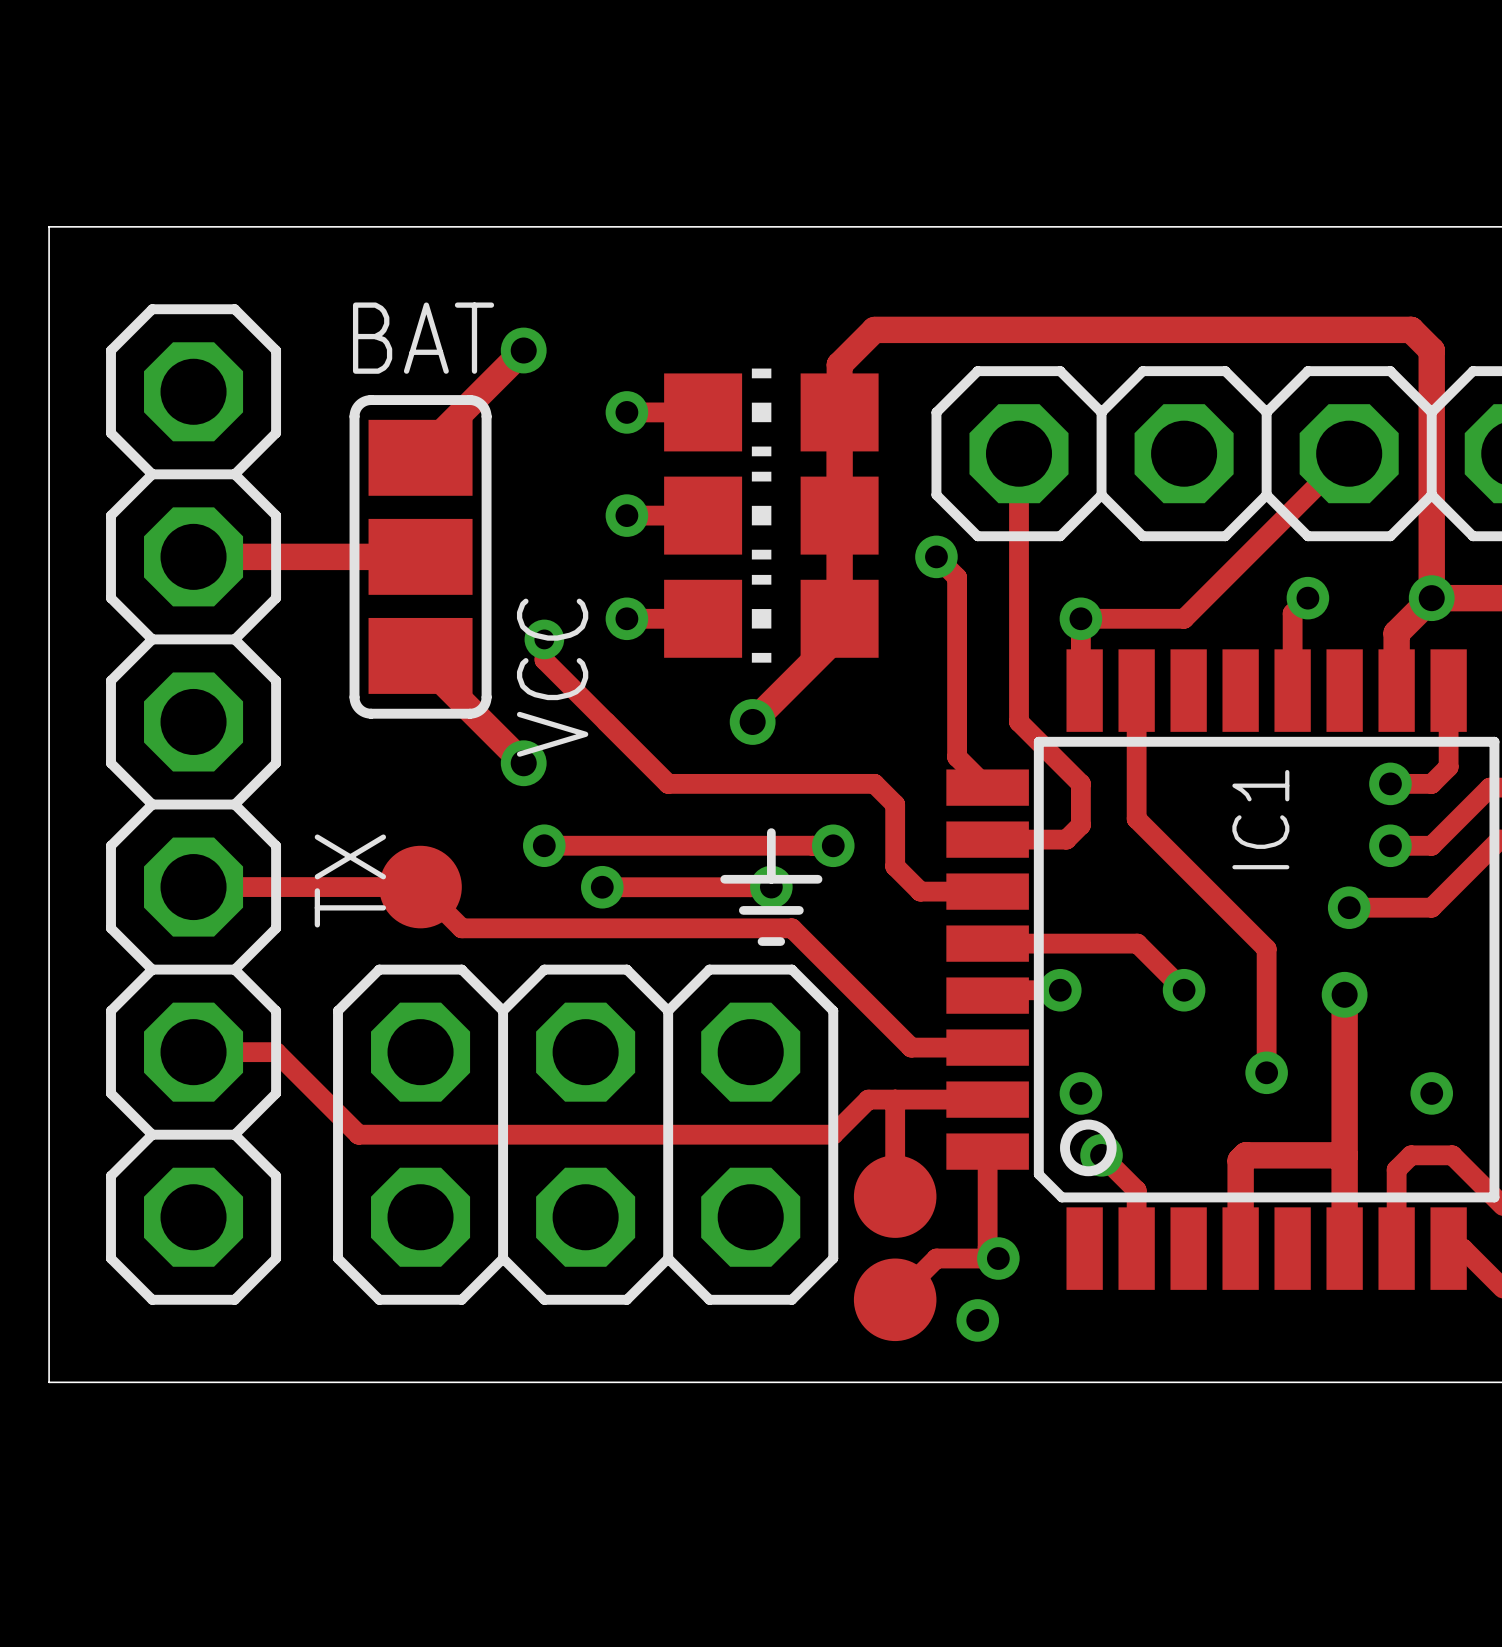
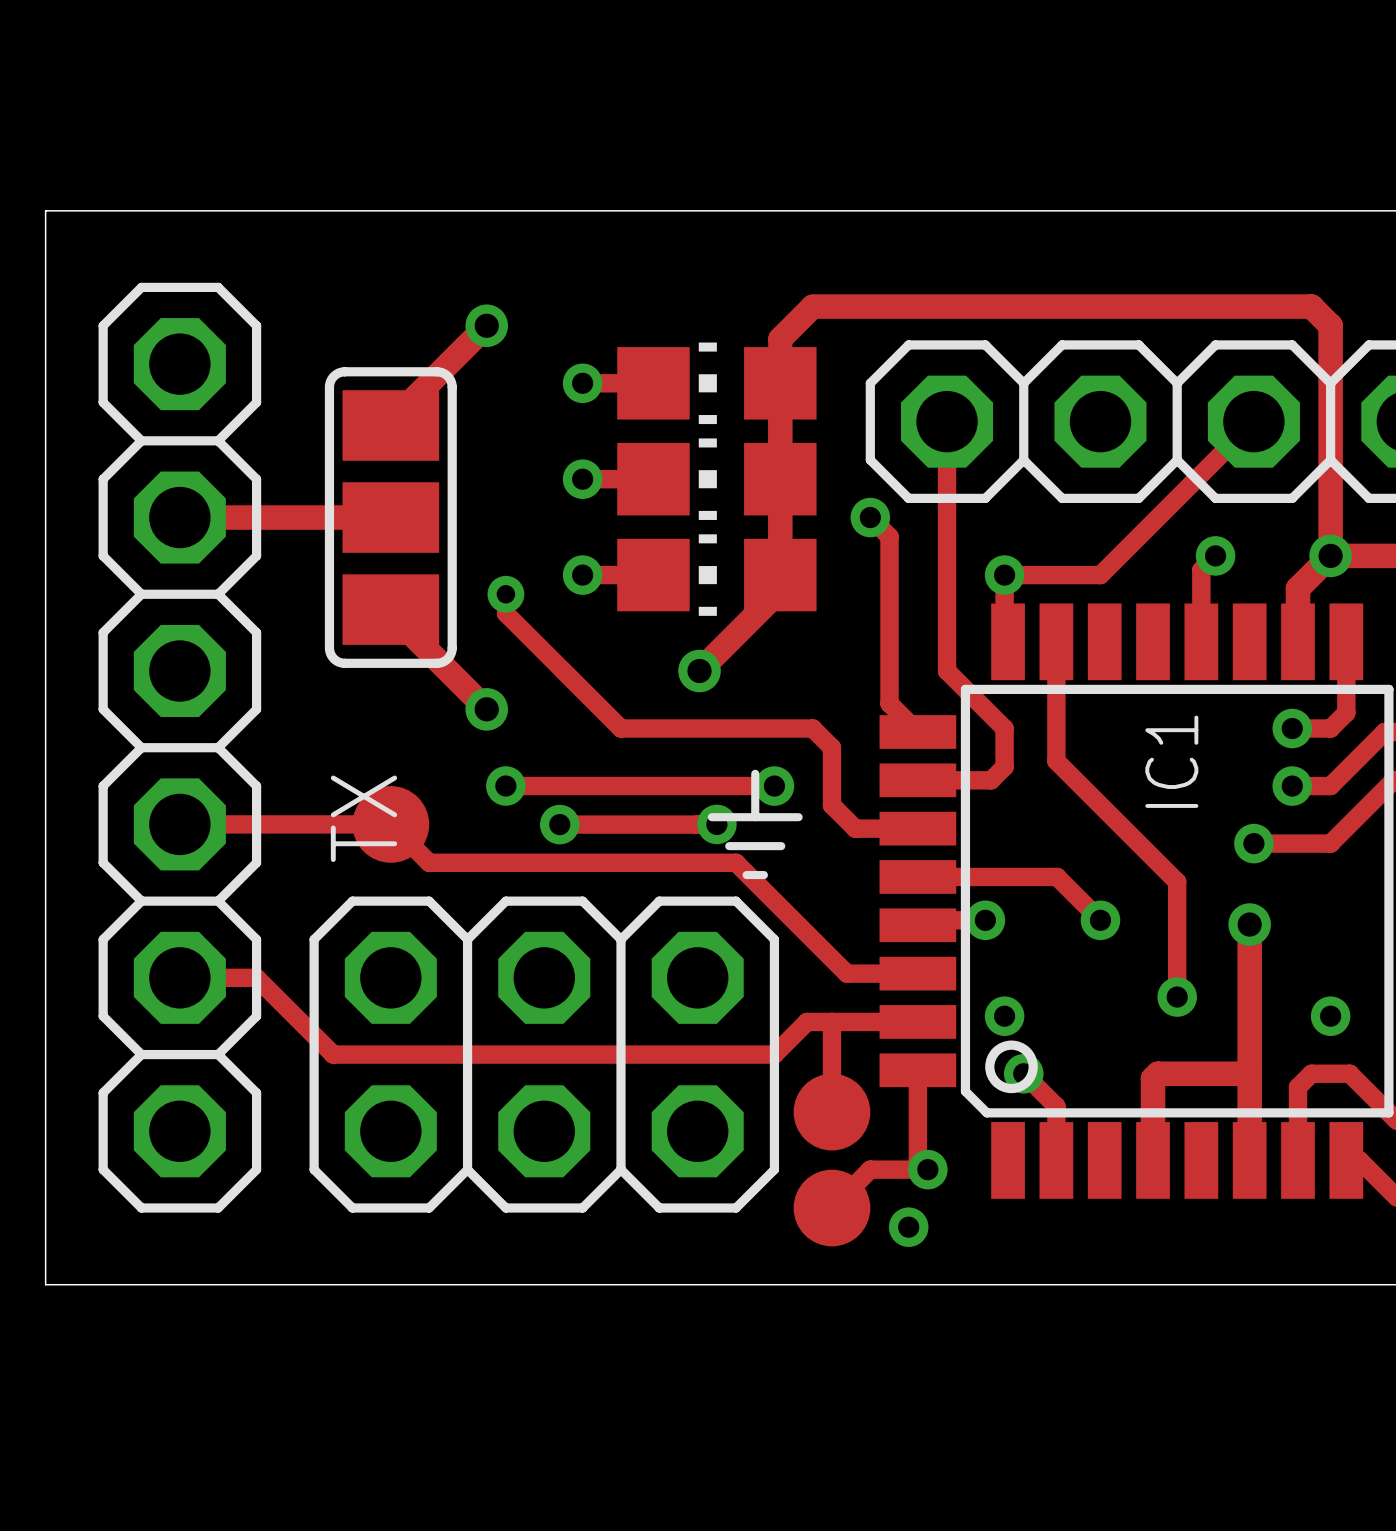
text: BAT (423, 338) -> none
text: VCC (552, 677) -> none
text position: TX (350, 880) -> TX (363, 818)
text position: ⏚ (771, 887) -> ⏚ (755, 824)

